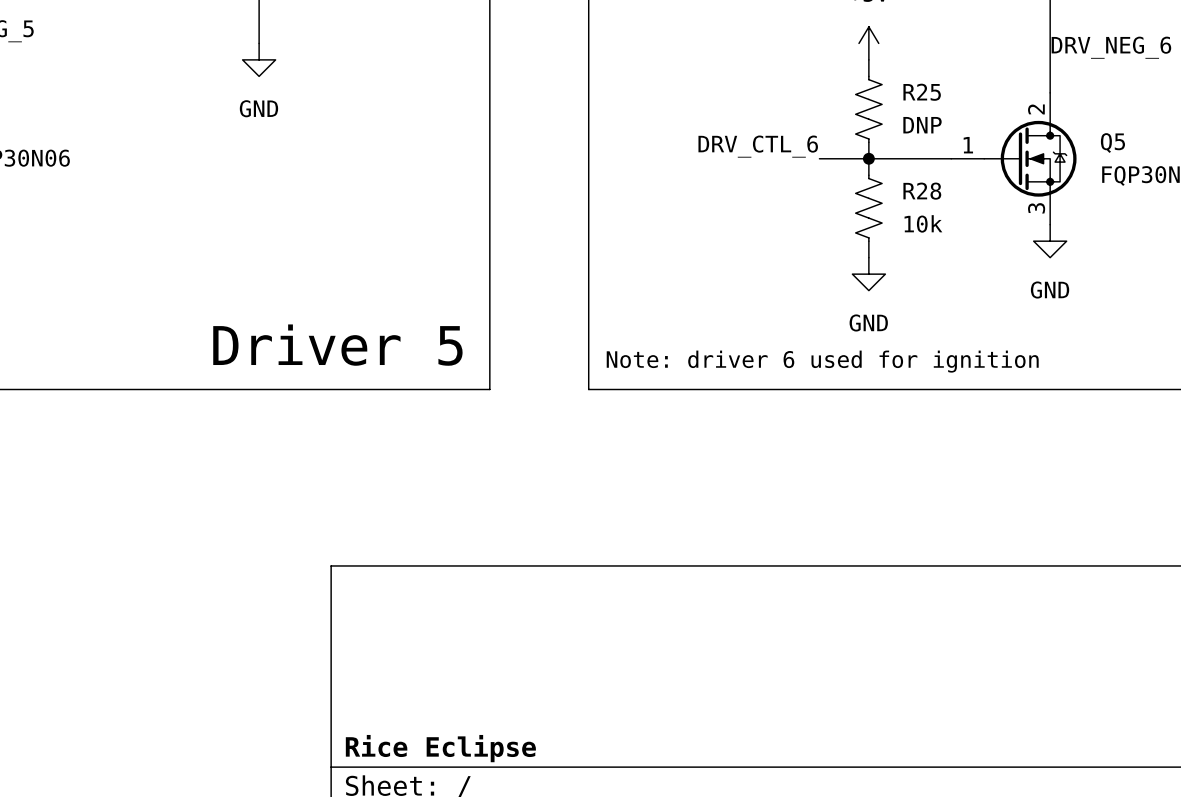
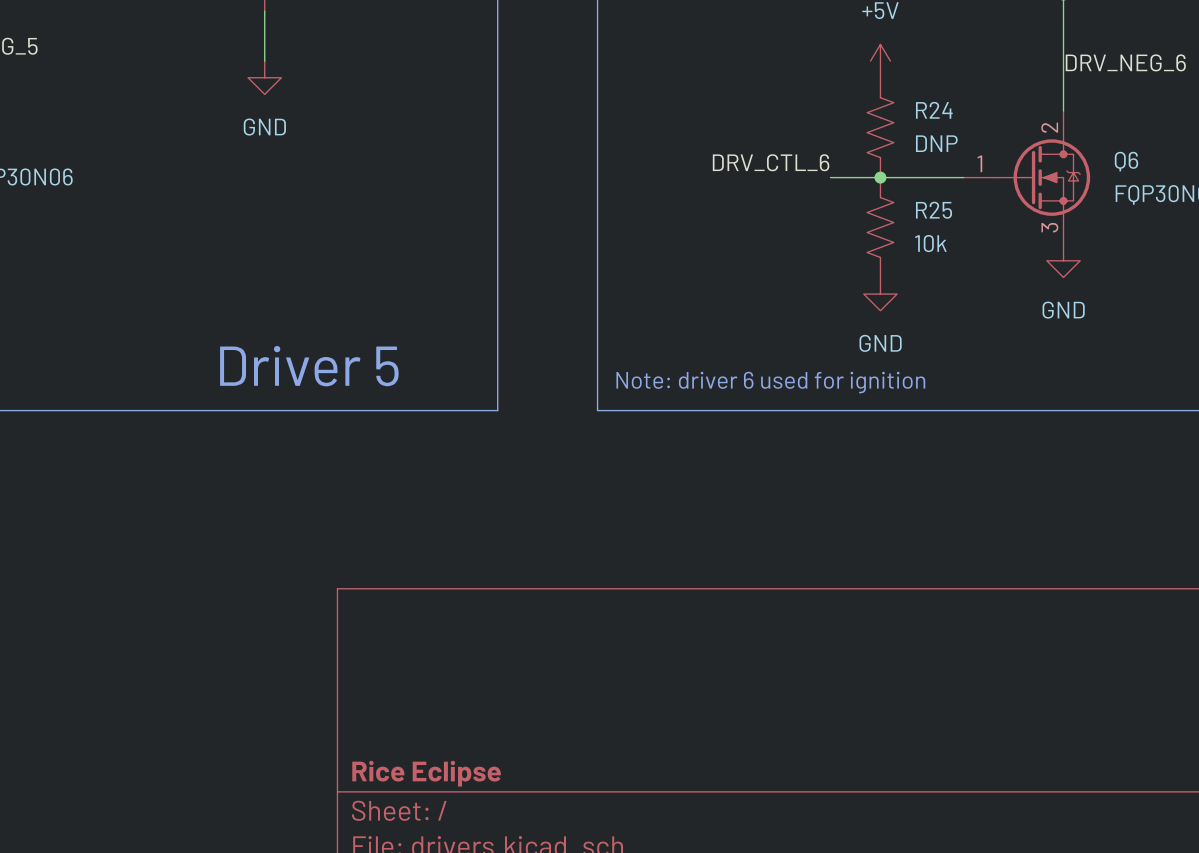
R25 name: R25 (922, 92) -> R24 (934, 110)
Q5 name: Q5 (1112, 143) -> Q6 (1126, 161)
R28 name: R28 (922, 191) -> R25 (934, 210)

